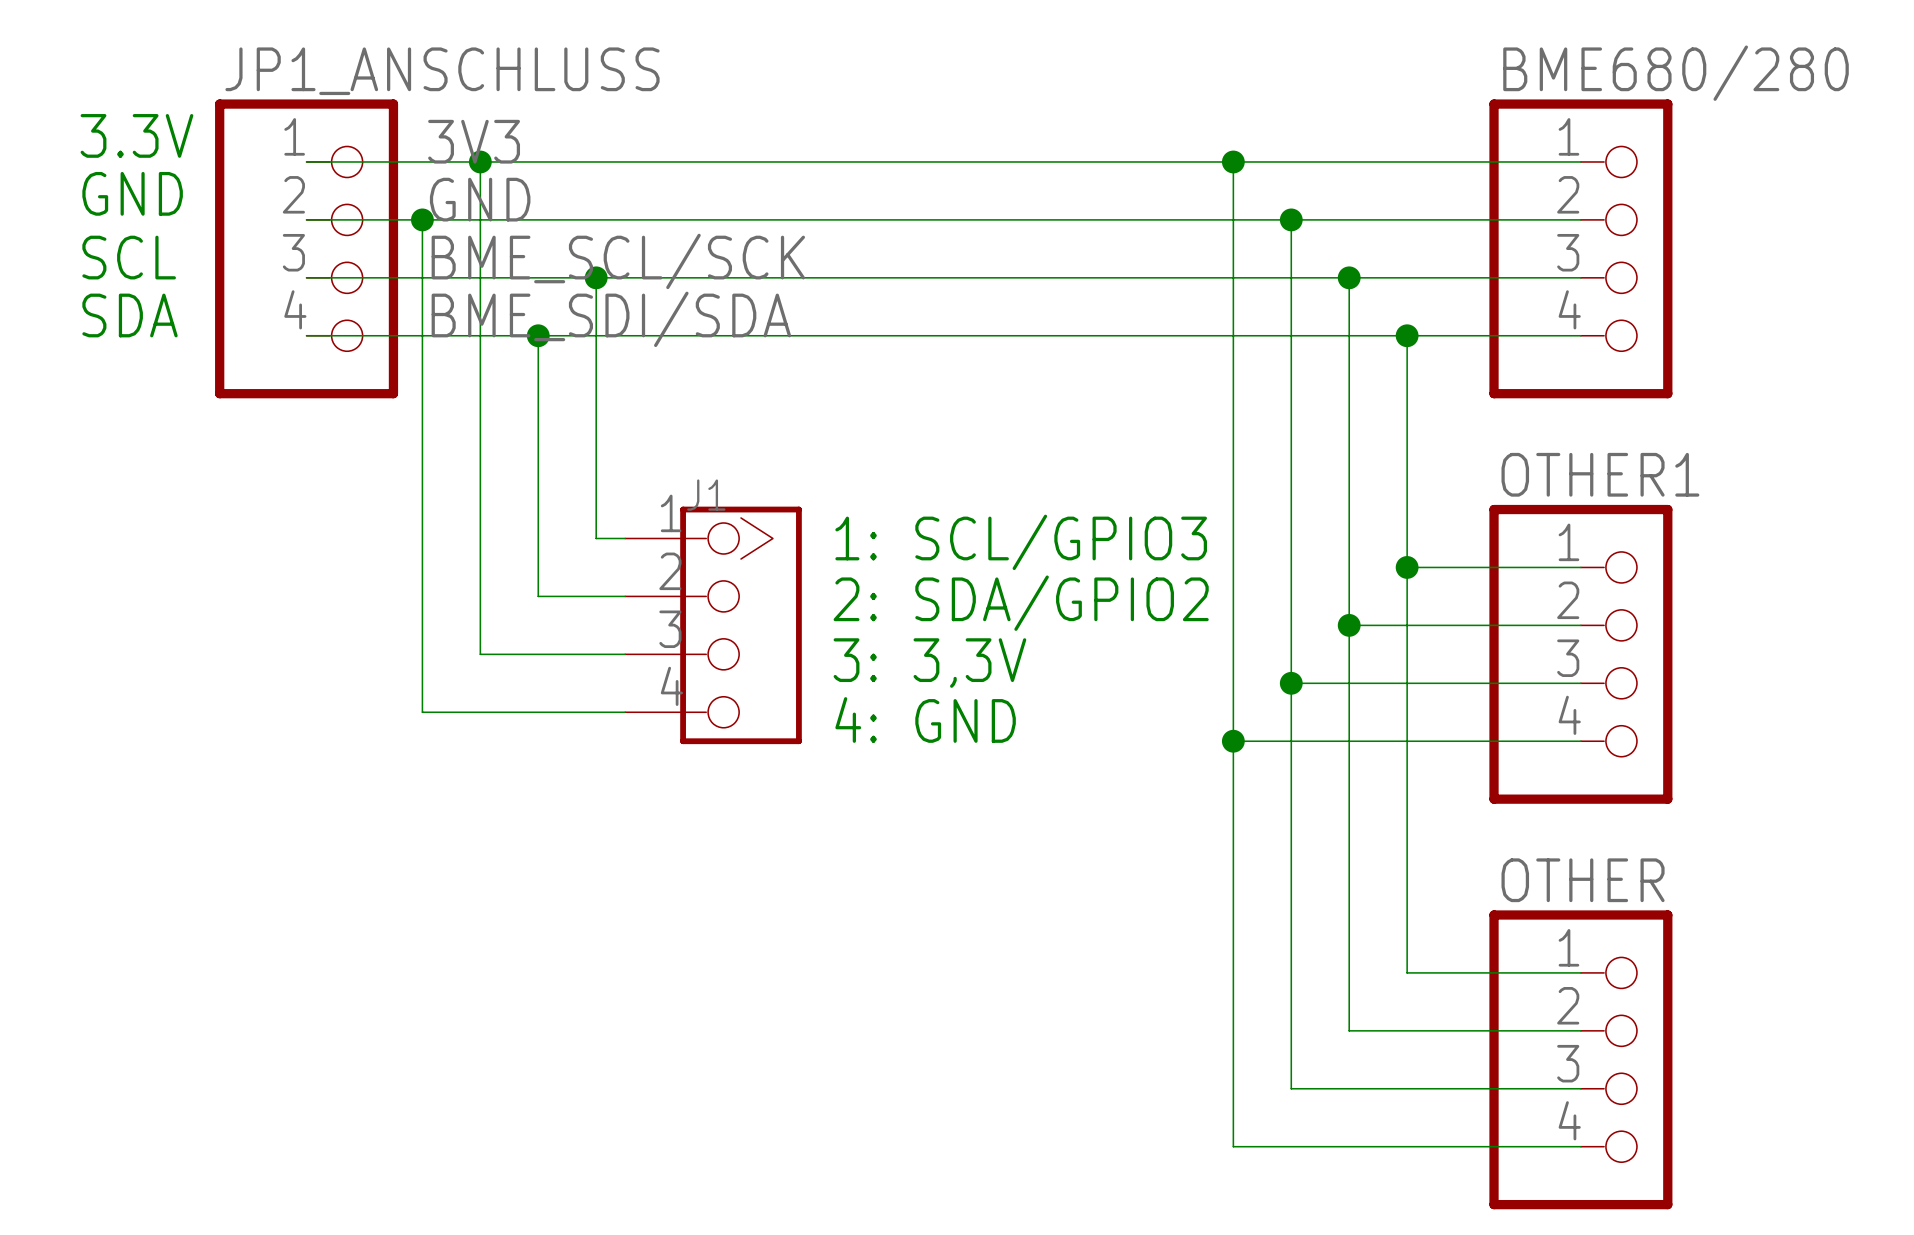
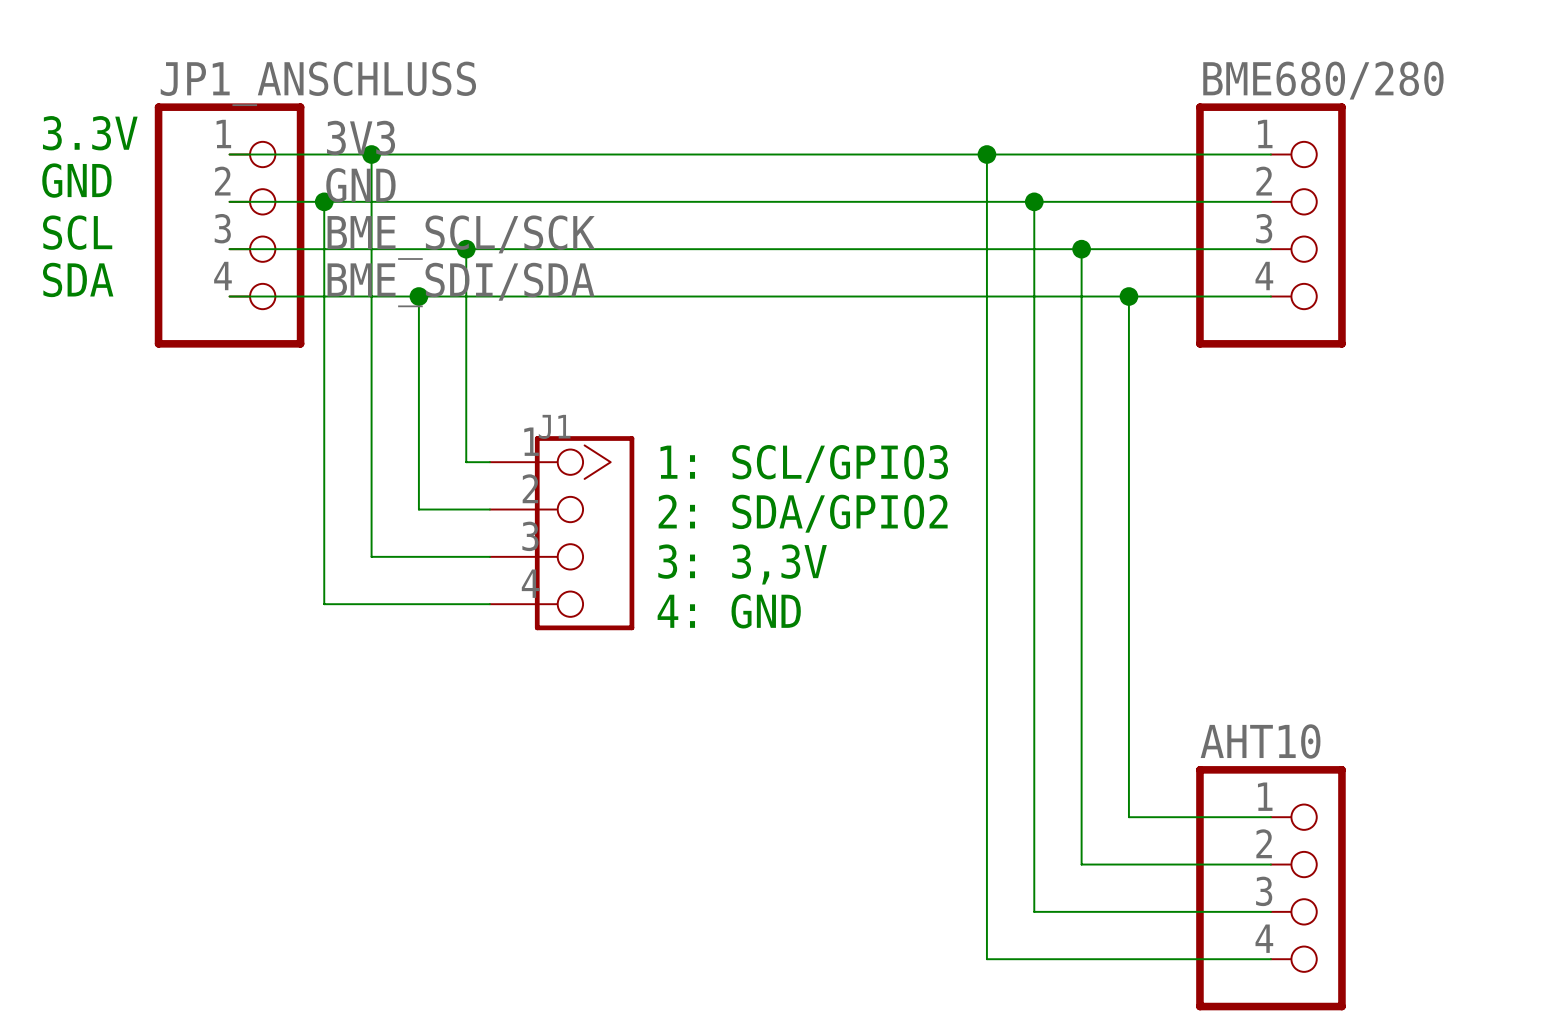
wire: (1407, 567) (1580, 567) -> none
junction: (1407, 567) -> none
wire: (1349, 625) (1580, 625) -> none
junction: (1349, 625) -> none
OTHER1: (1580, 654) -> none
wire: (1291, 683) (1580, 683) -> none
junction: (1291, 683) -> none
wire: (1233, 741) (1580, 741) -> none
junction: (1233, 741) -> none
OTHER name: OTHER (1583, 880) -> AHT10 (1260, 741)

